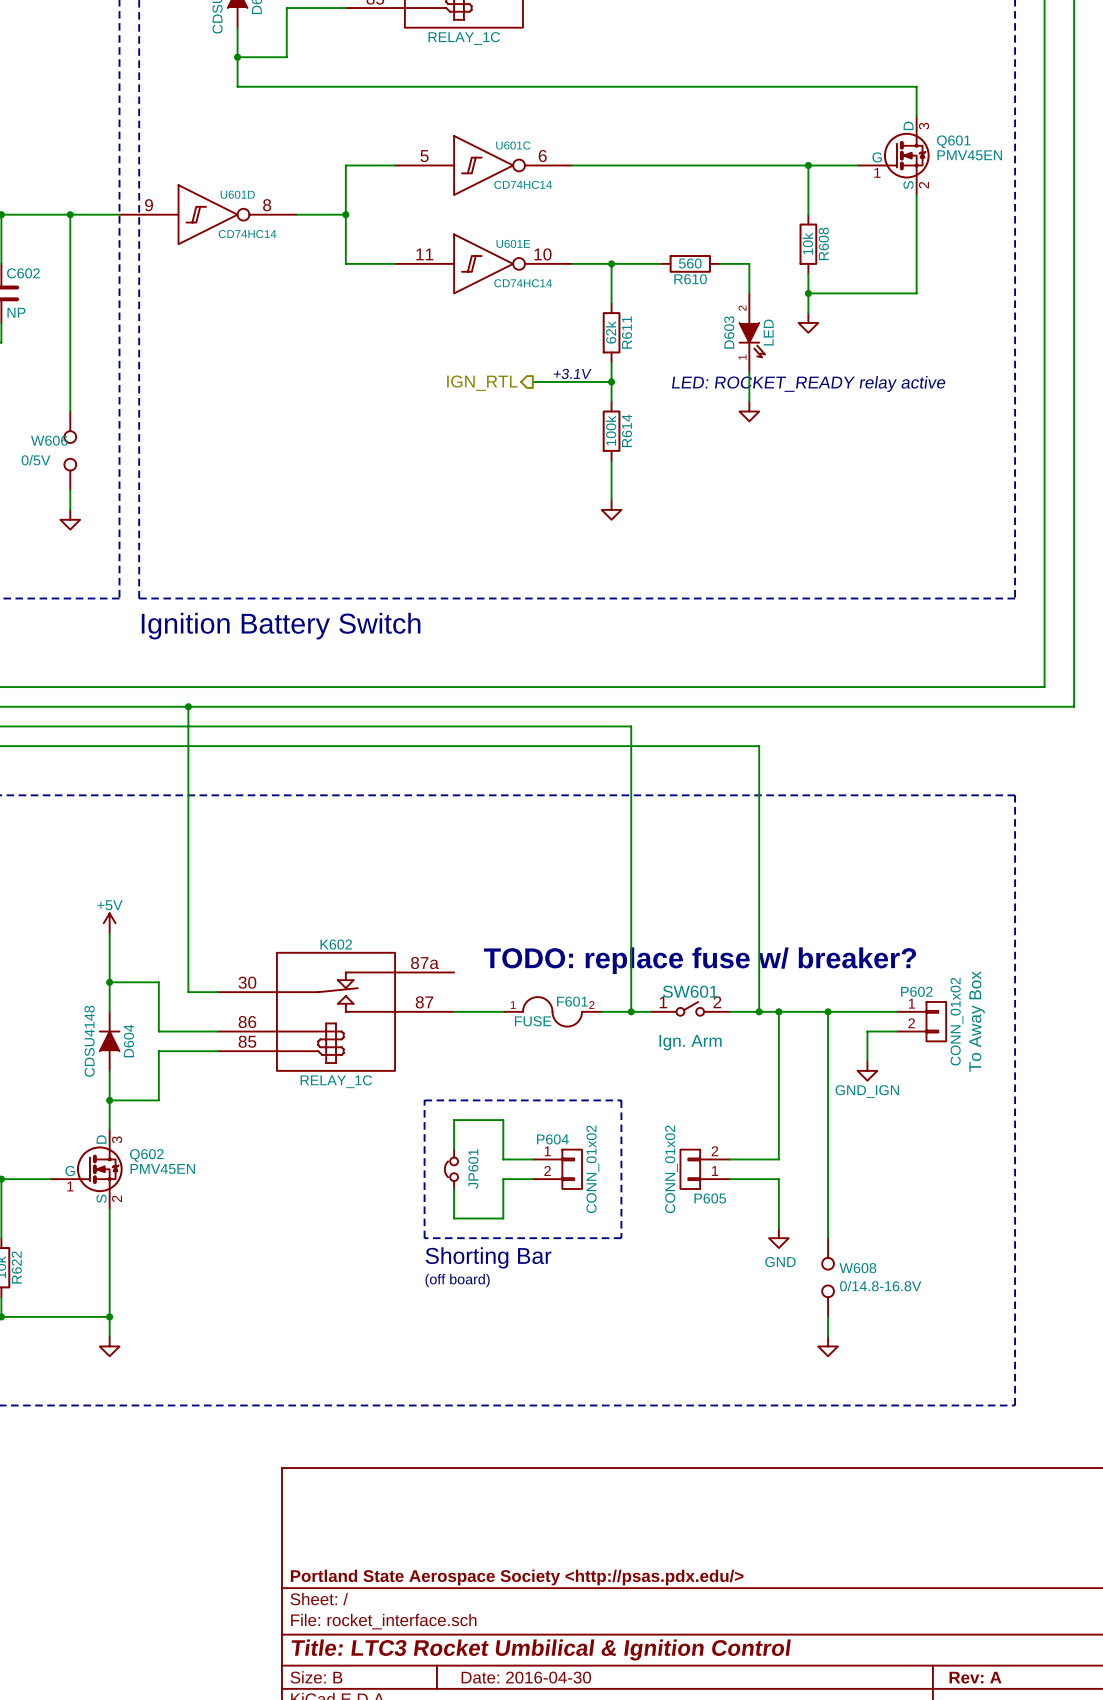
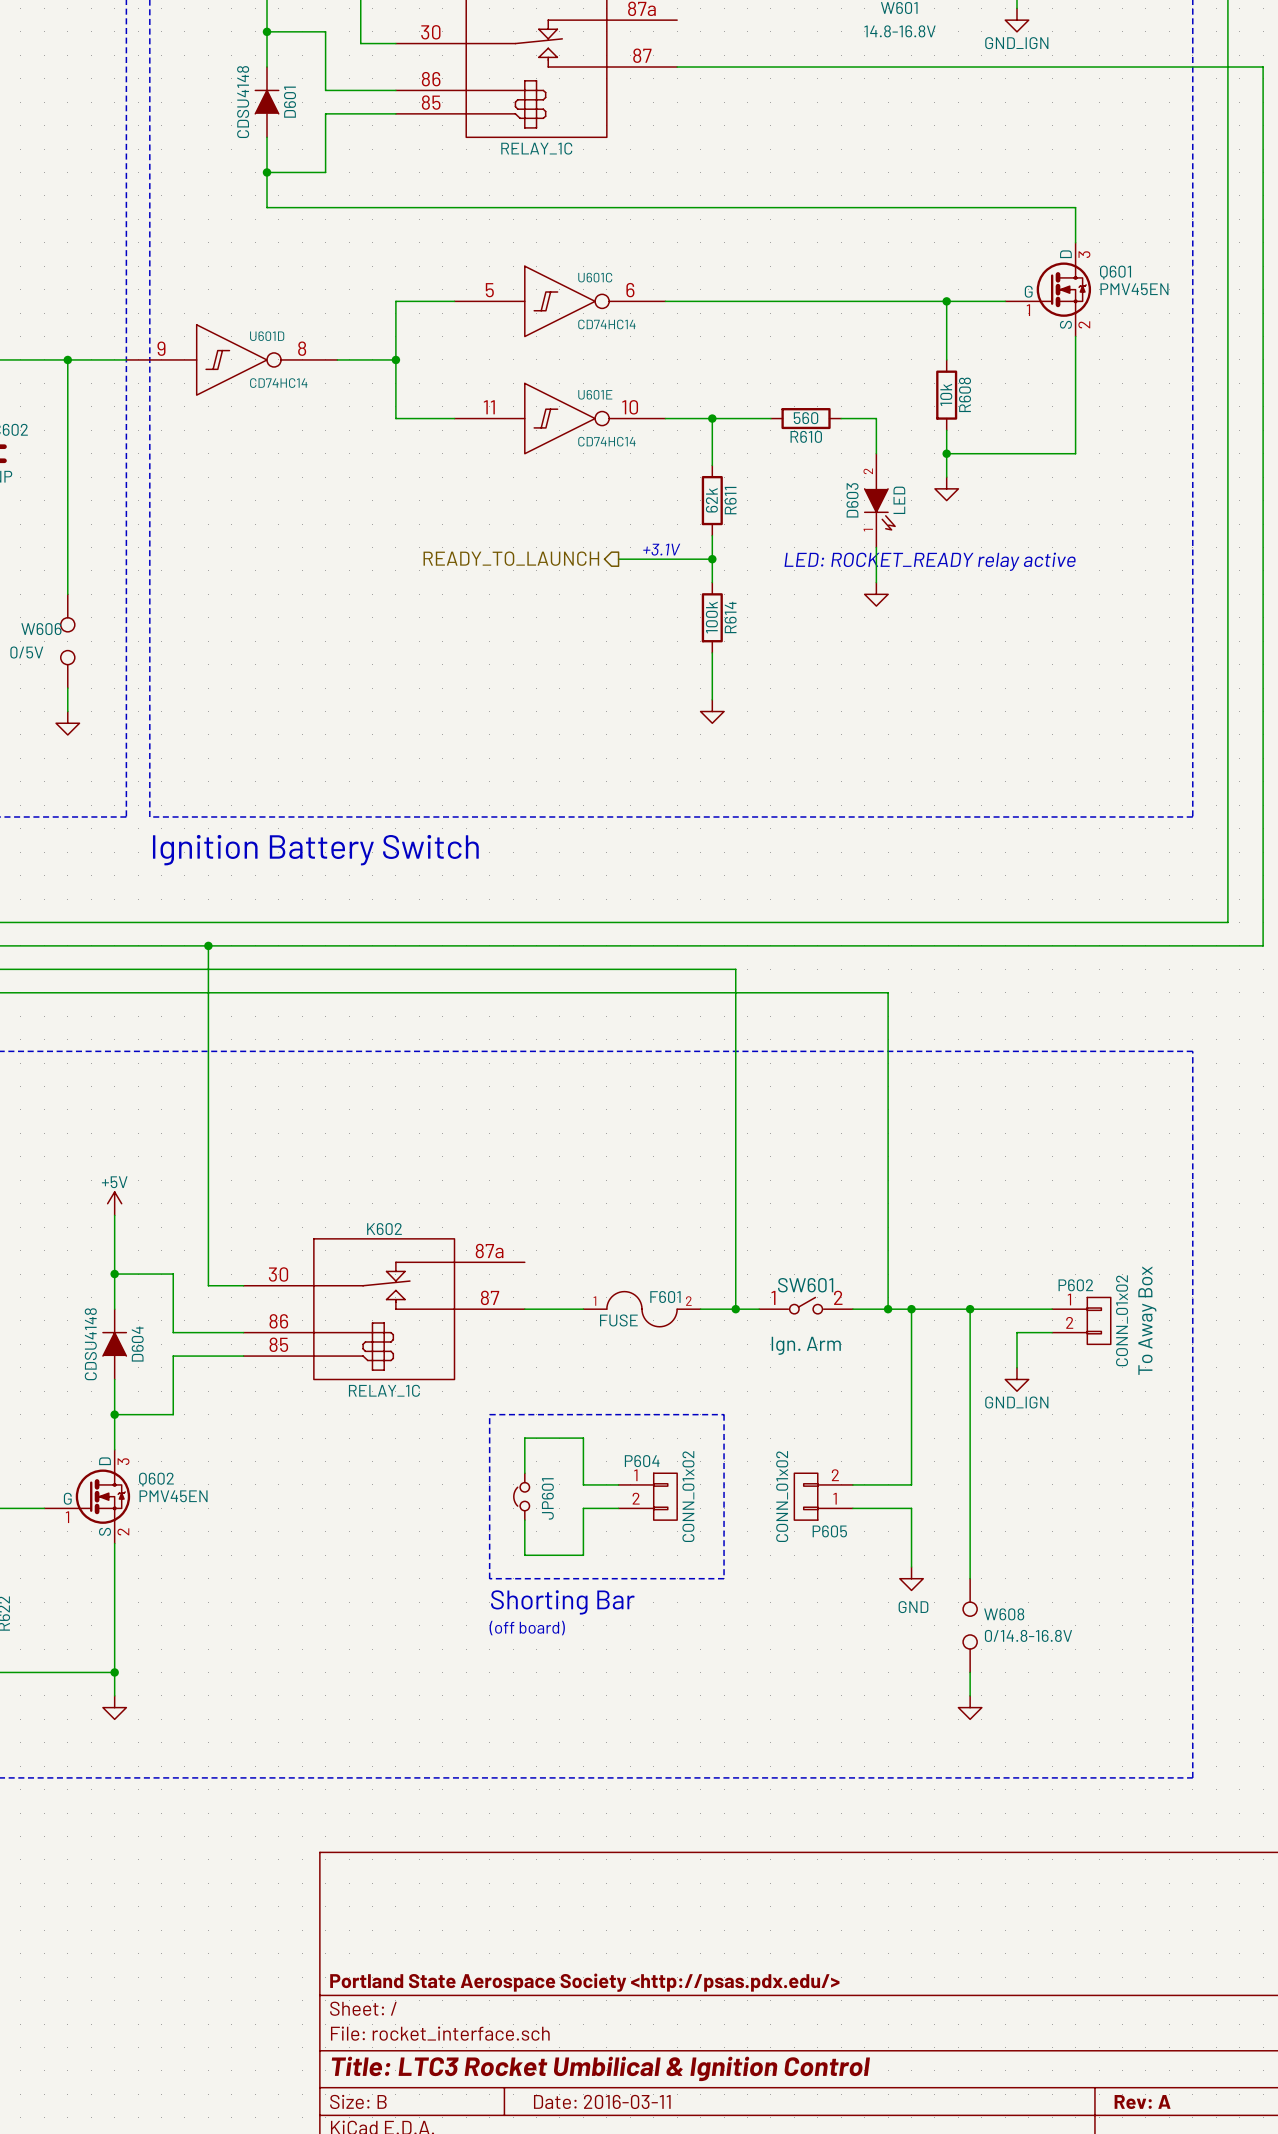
hierarchical label: IGN_RTL (482, 383) -> READY_TO_LAUNCH (511, 558)
text: TODO: replace fuse w/ breaker? (700, 960) -> none
title block: Date: 2016-04-30 (526, 1677) -> Date: 2016-03-11 (602, 2101)

